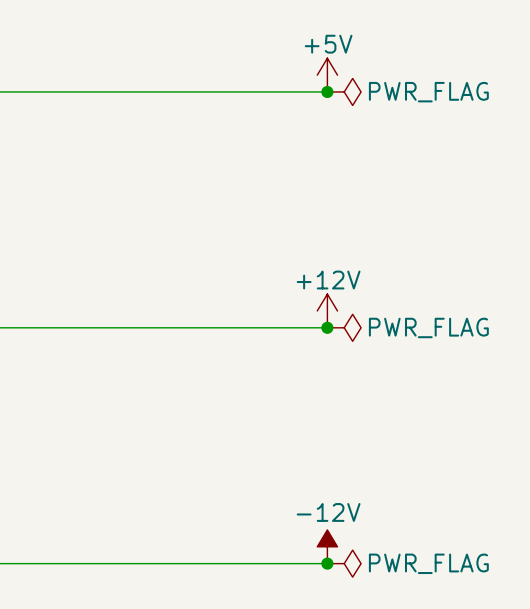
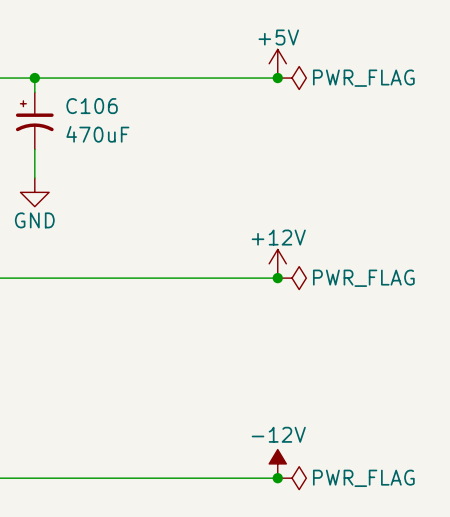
wire: none -> (34, 78) (34, 92)
junction: none -> (34, 78)
C106: none -> 470uF (34, 120)
wire: none -> (34, 149) (34, 178)
power symbol: none -> GND (34, 192)

